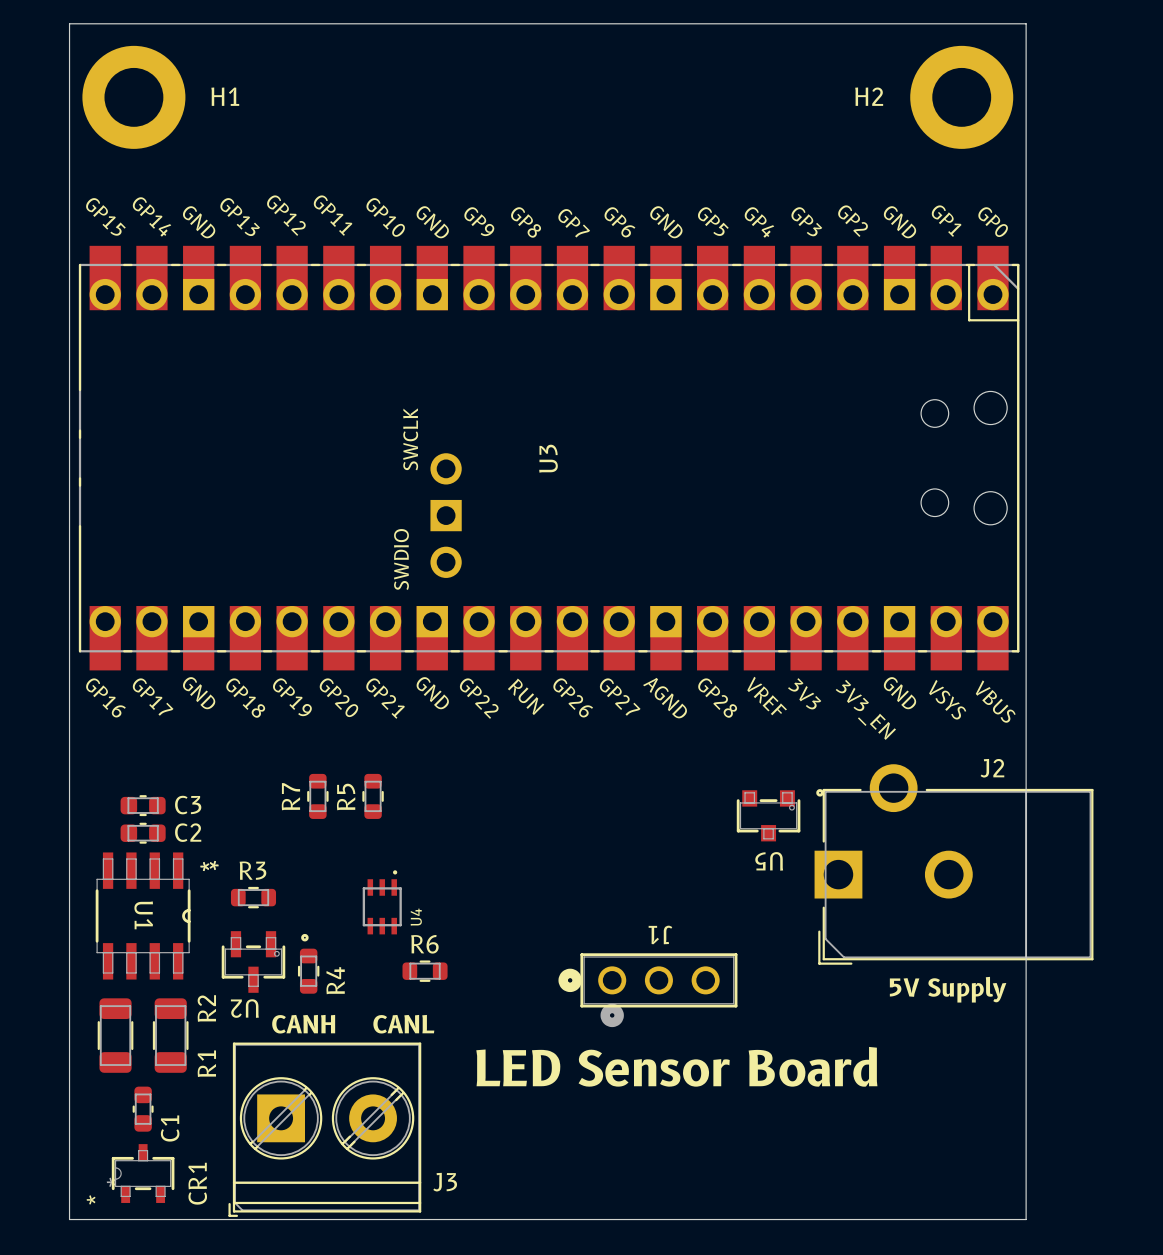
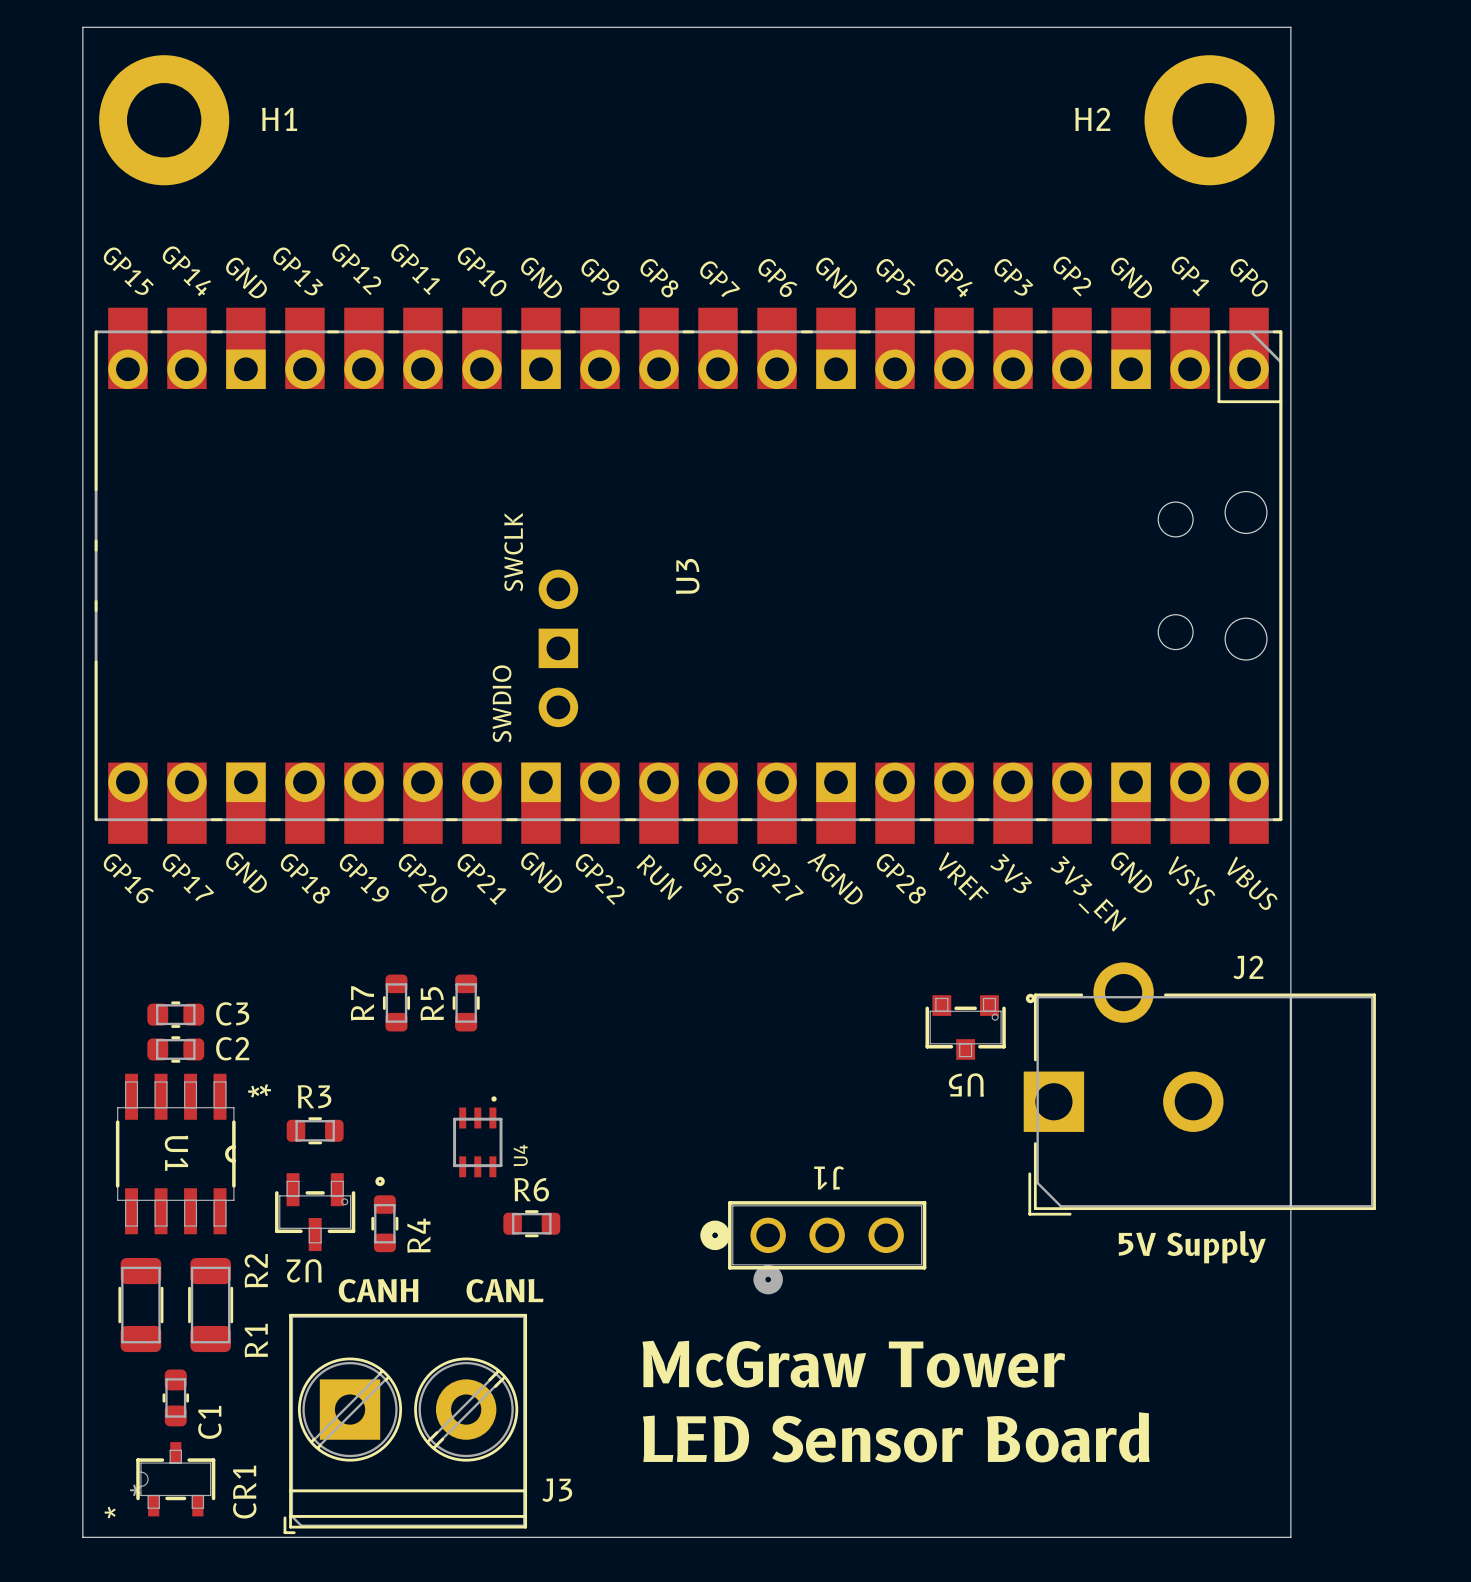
text position: LED Sensor Board (676, 1066) -> LED Sensor Board (896, 1437)
text: none -> McGraw Tower (853, 1364)

